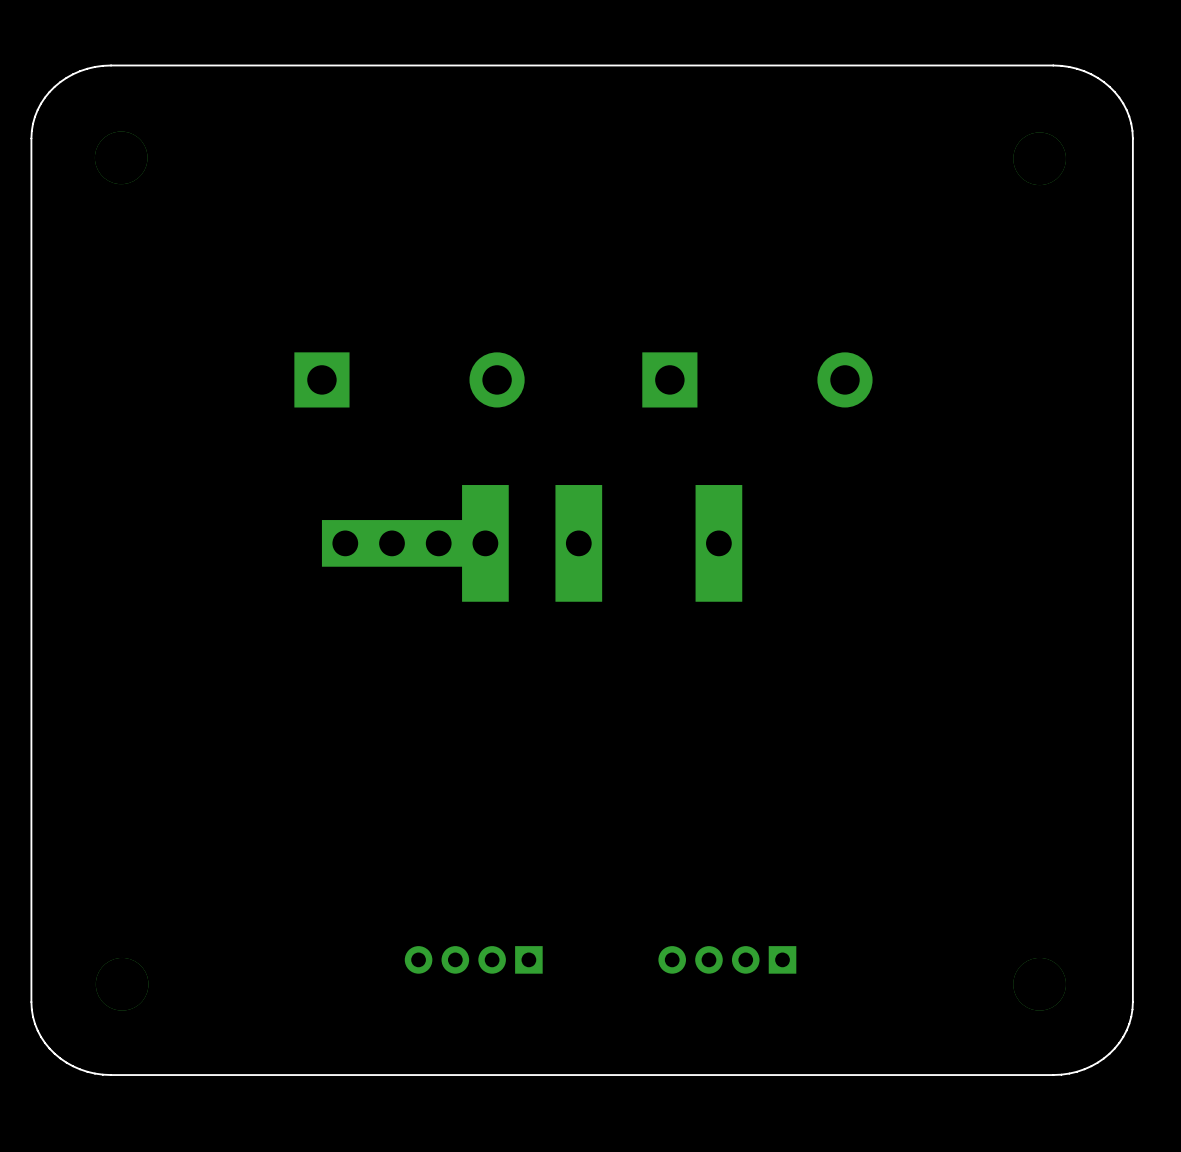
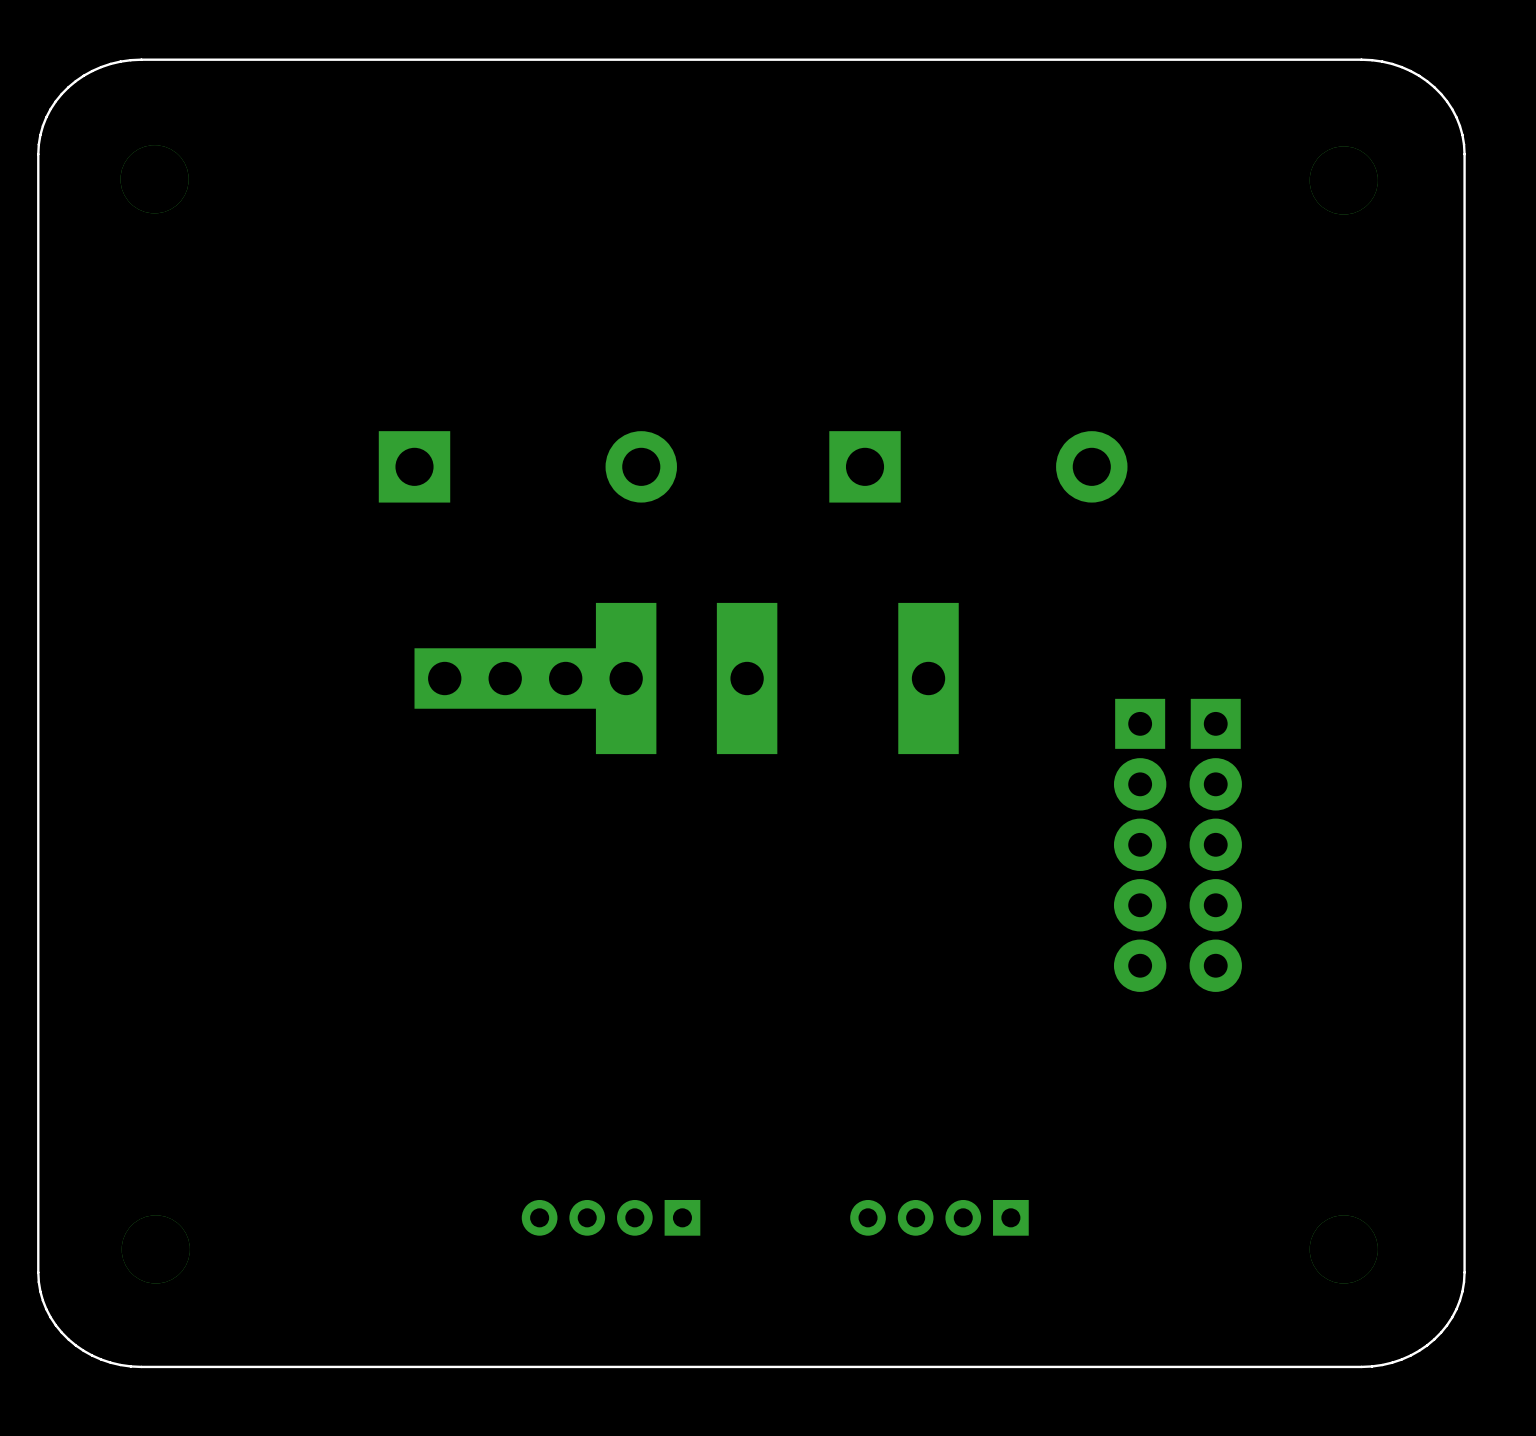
part: none -> (1140, 845)
part: none -> (1215, 845)

